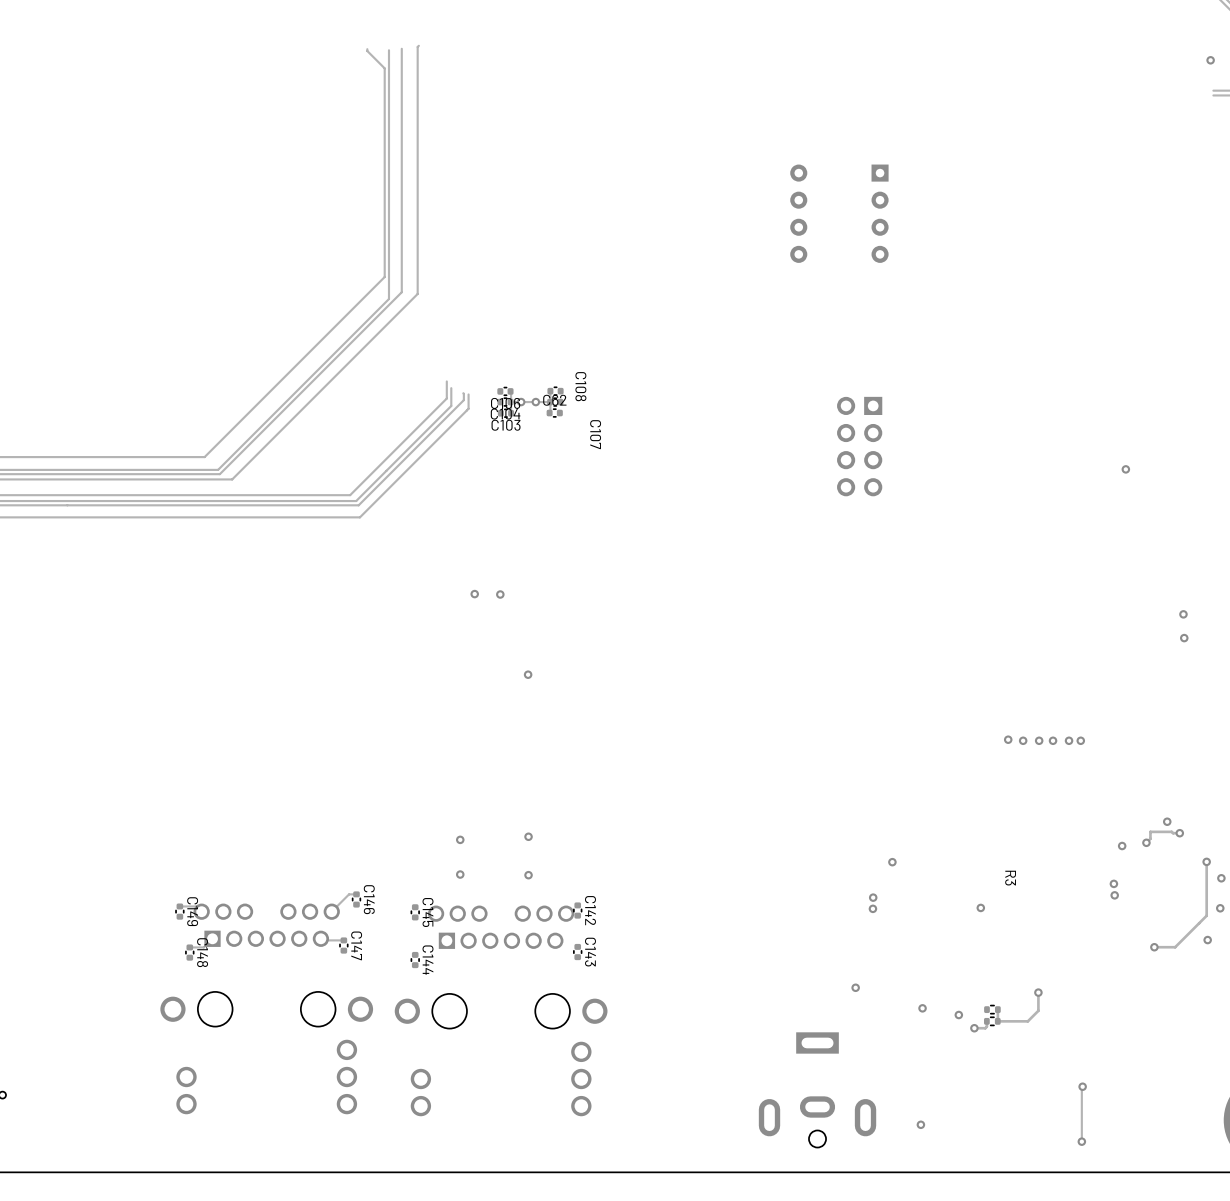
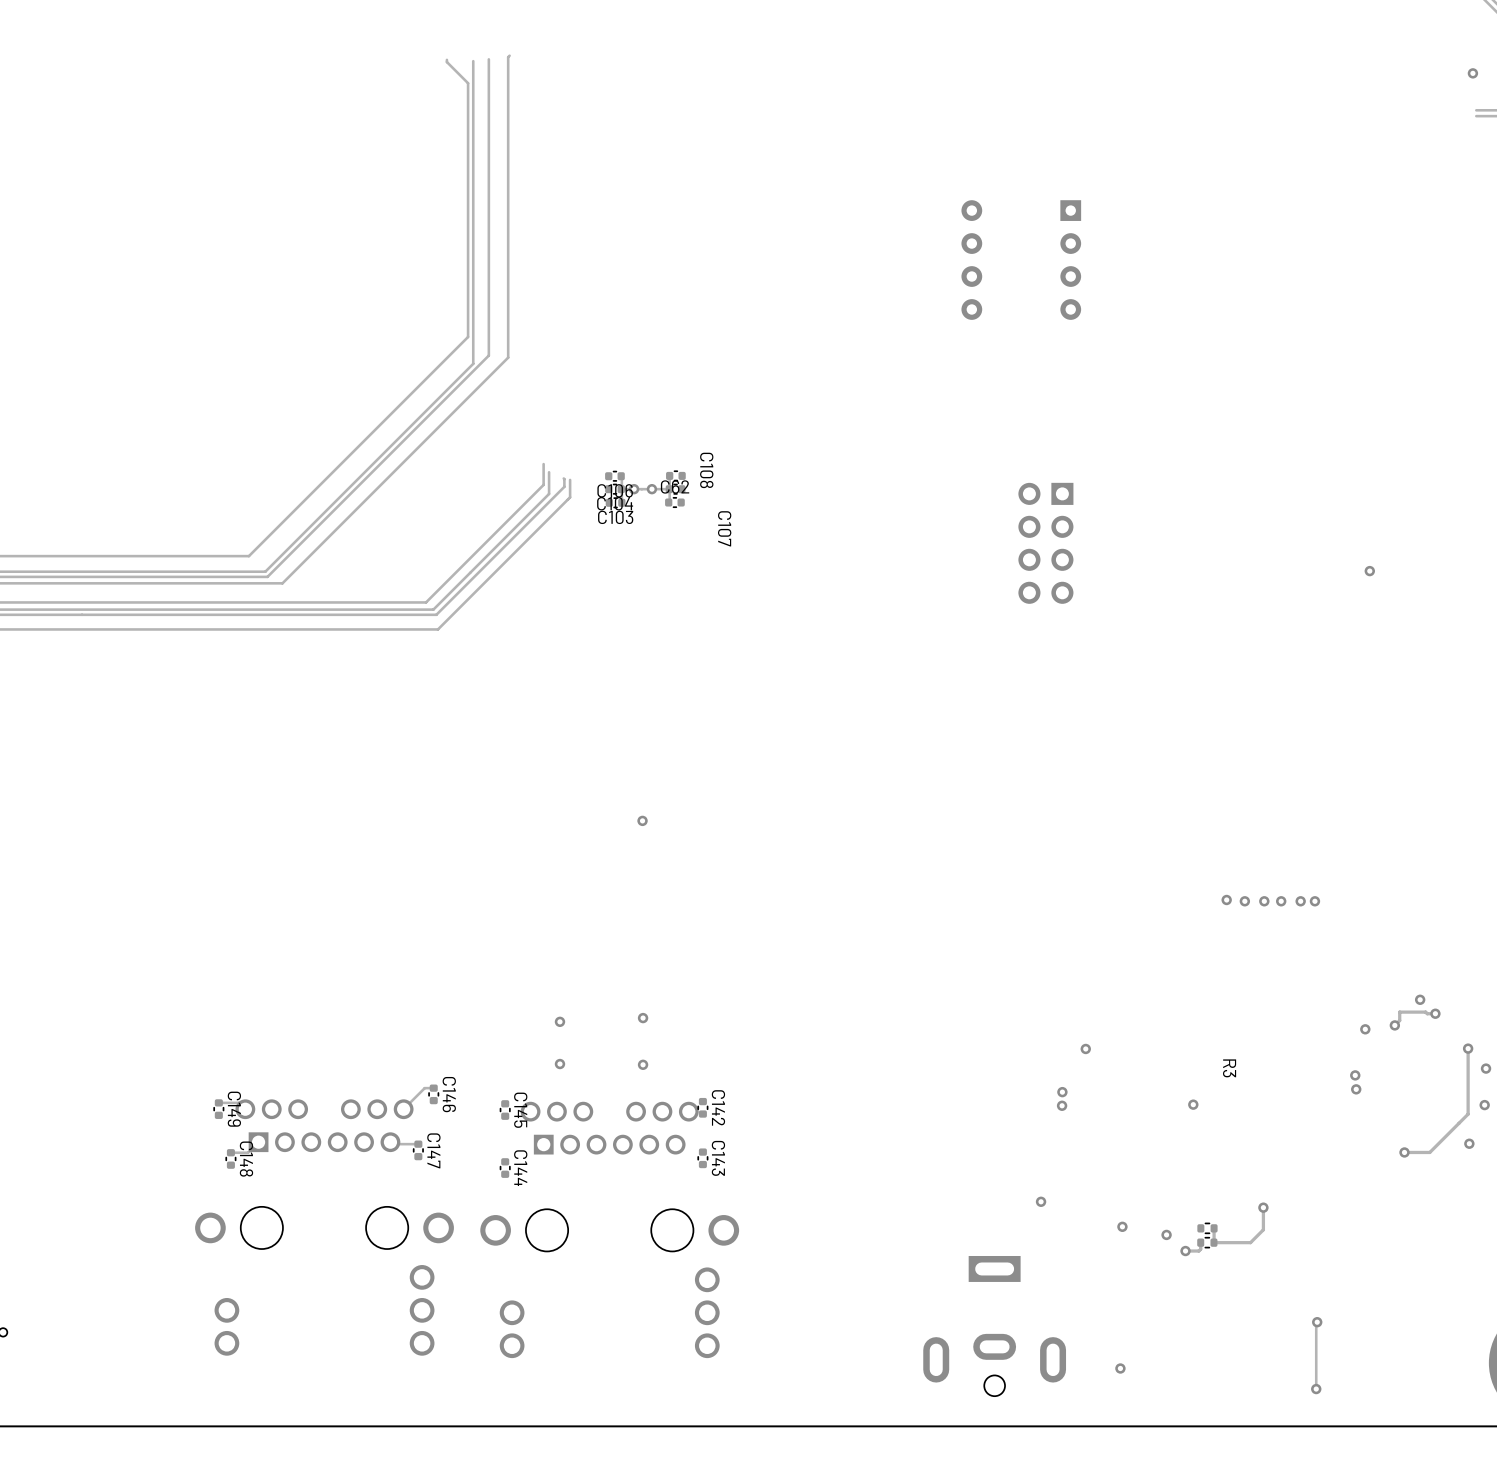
via: (474, 594) -> none
via: (500, 594) -> none
via: (1183, 614) -> none
via: (1184, 638) -> none

